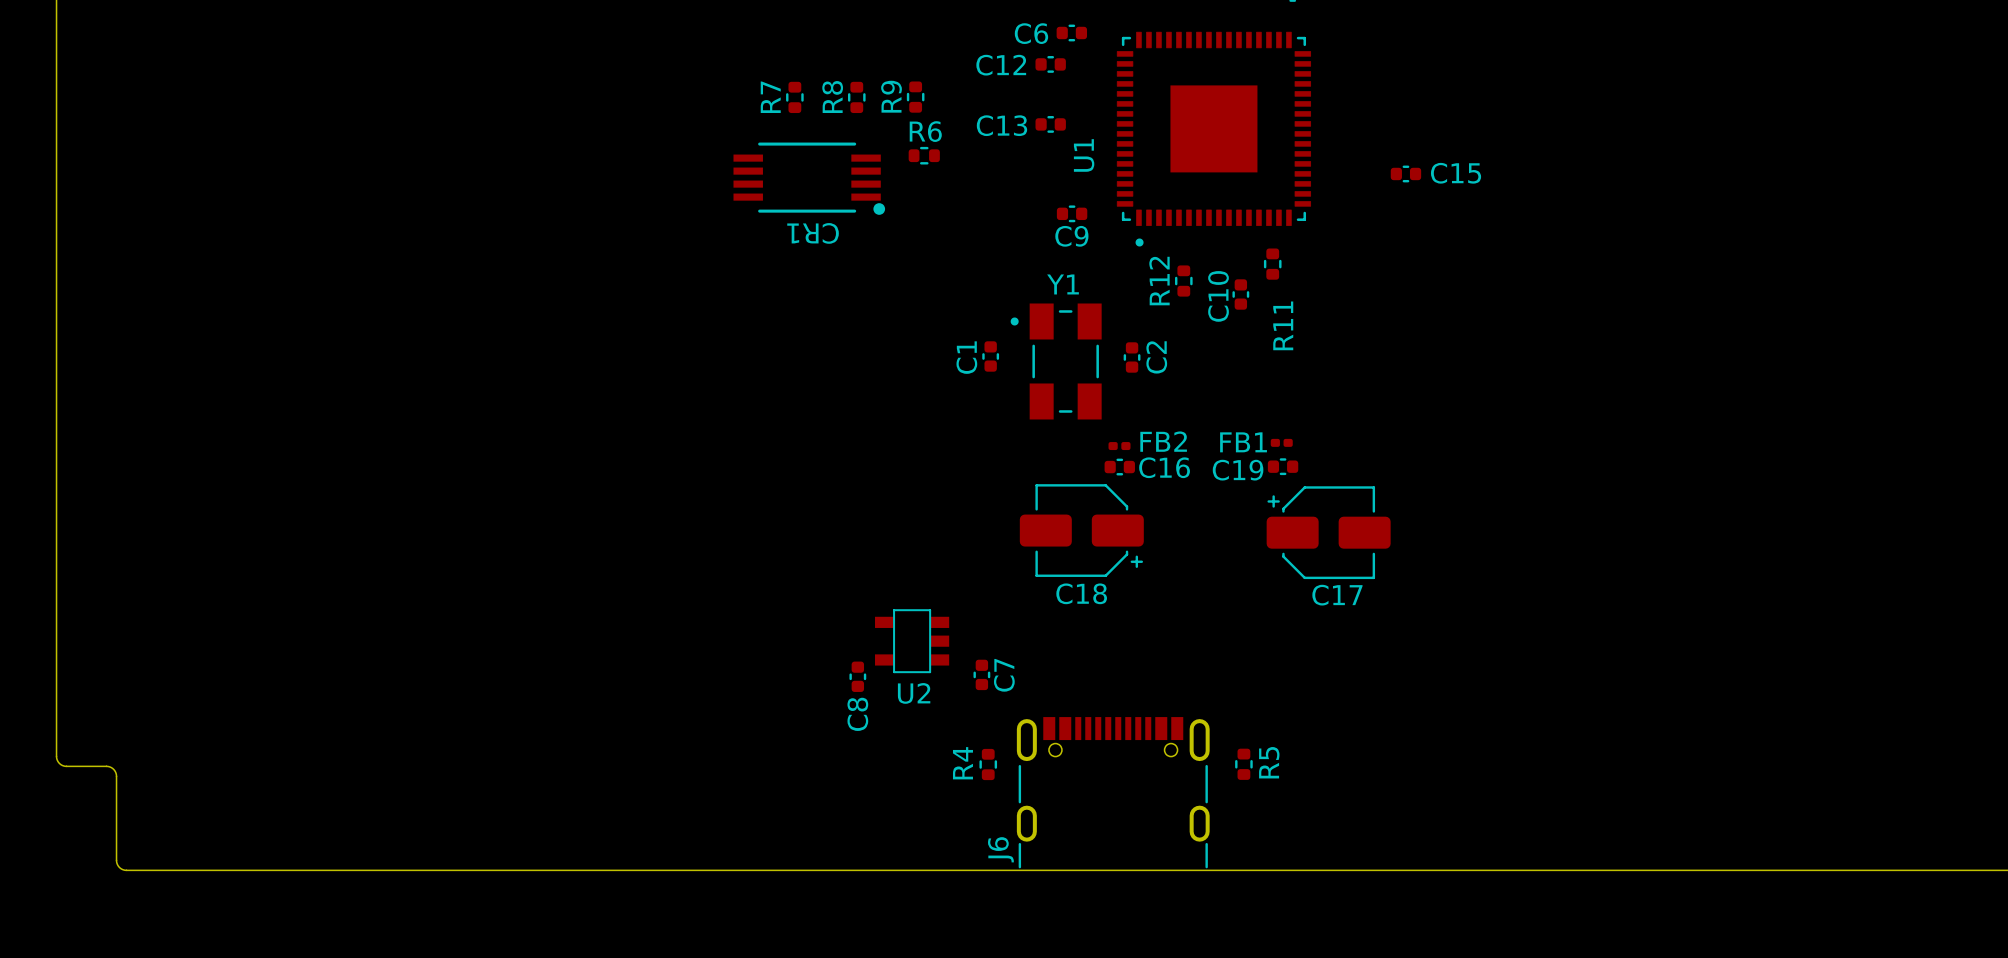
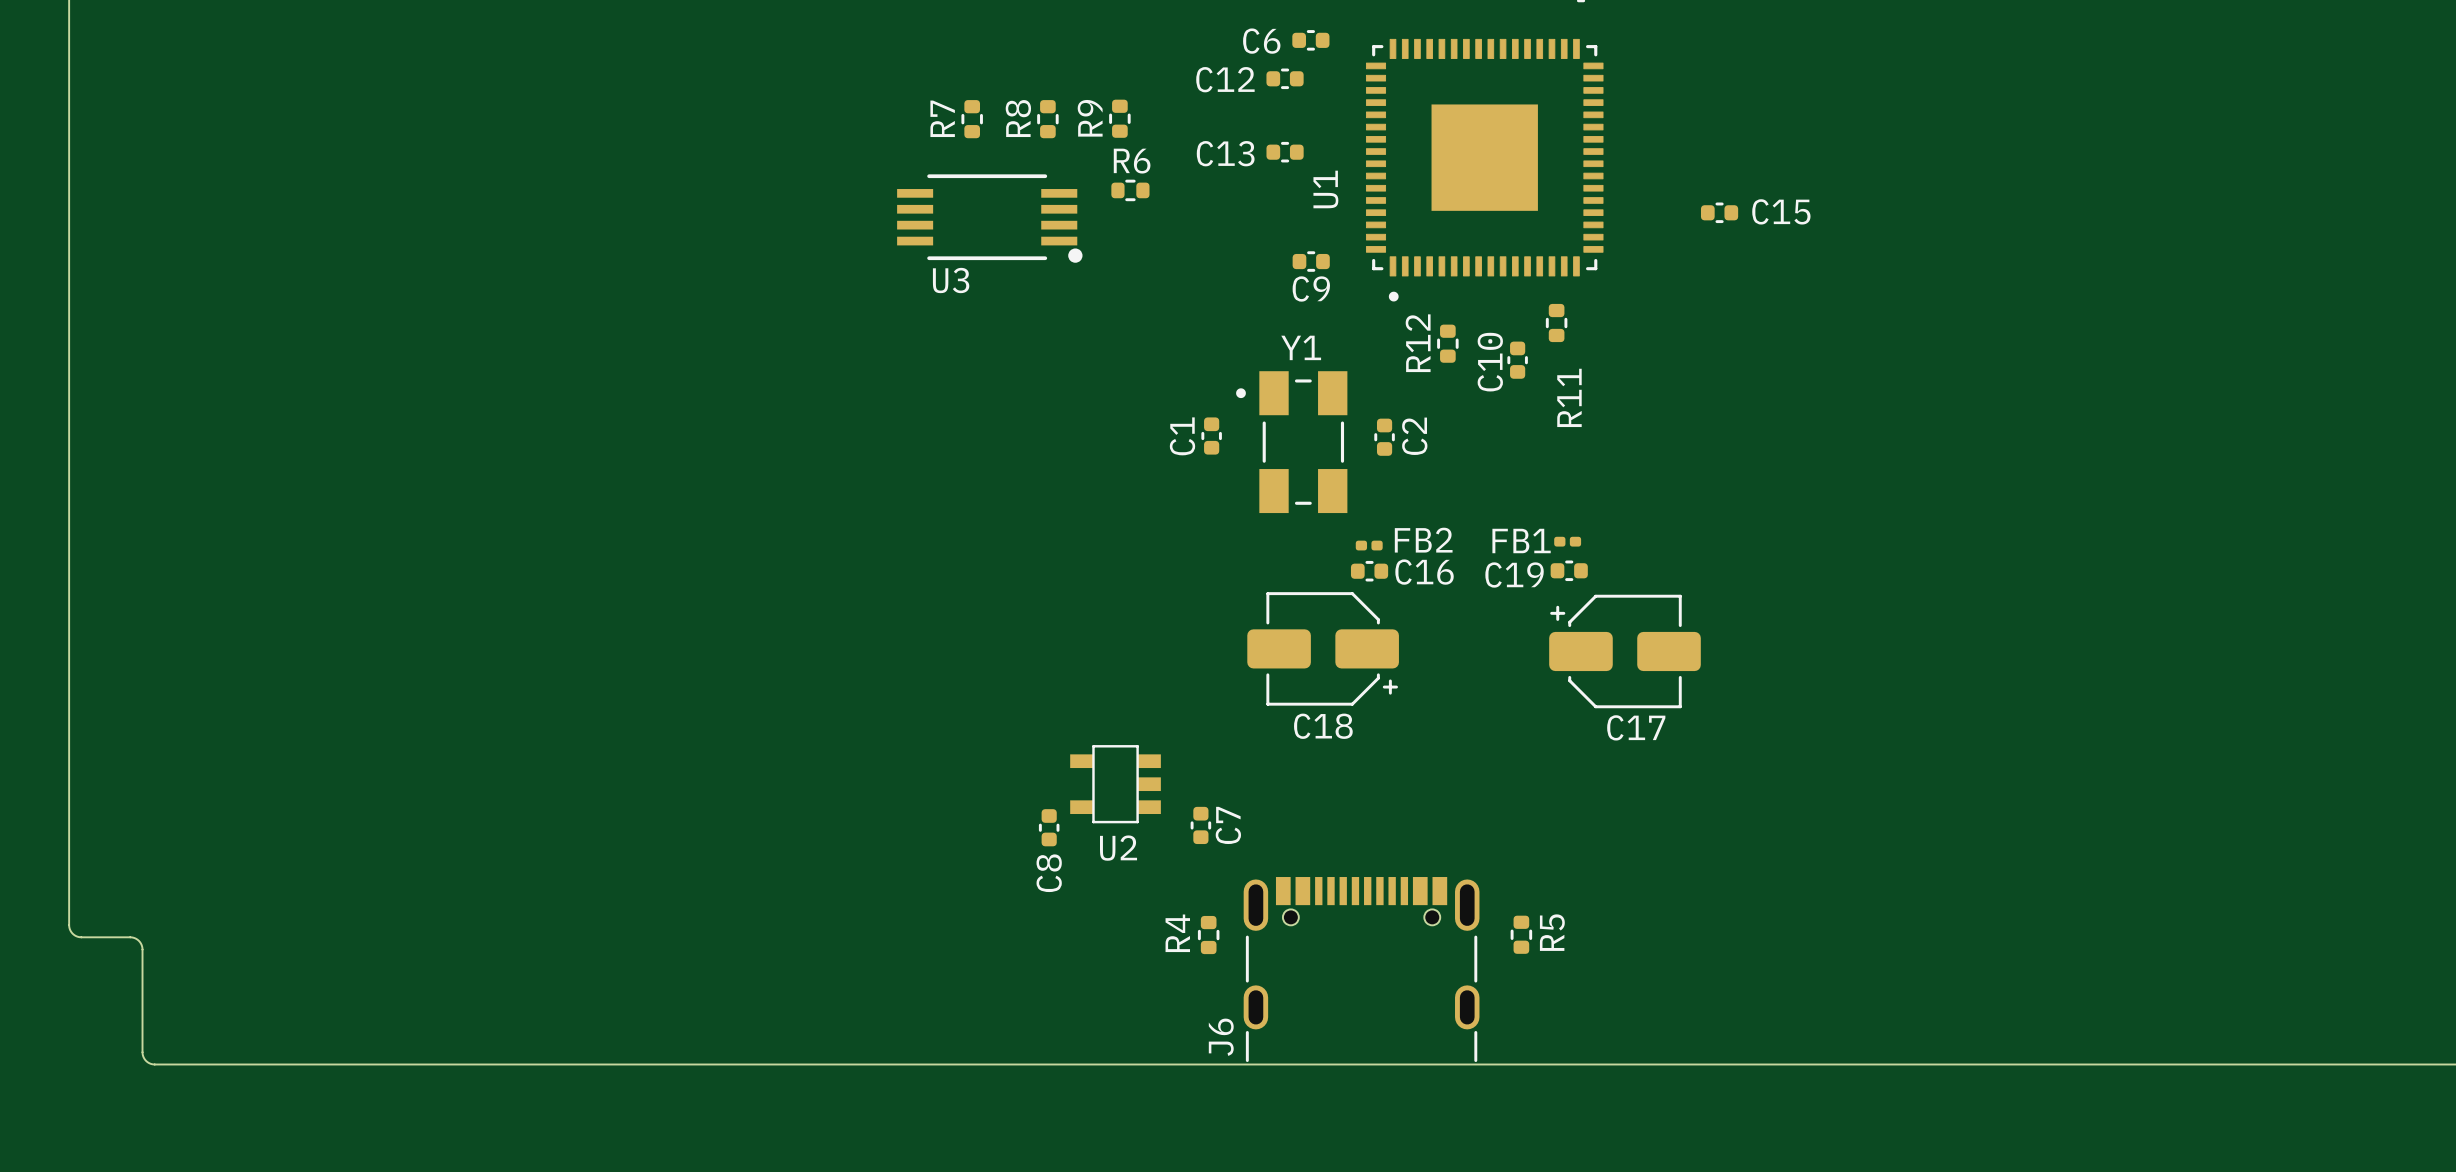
CR1 name: CR1 (813, 233) -> U3 (951, 280)

